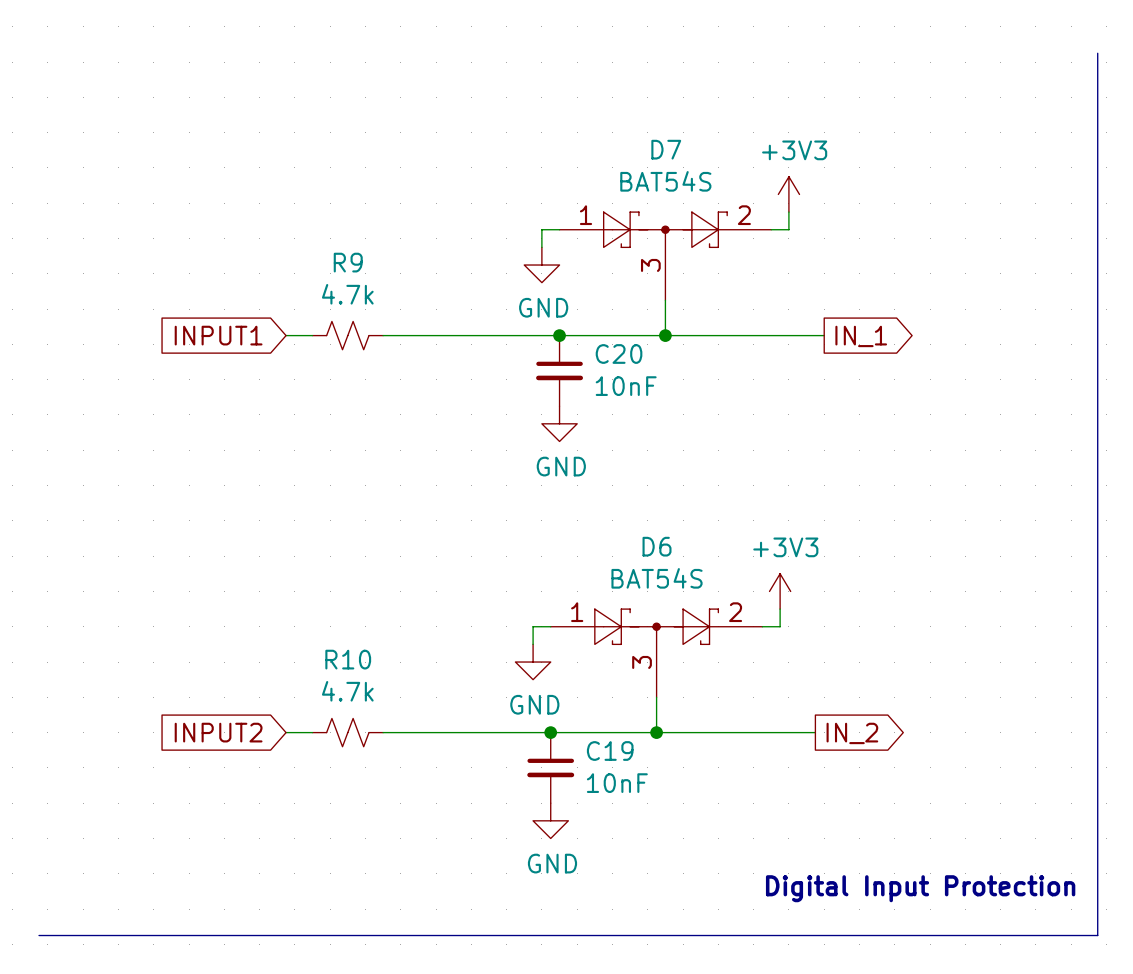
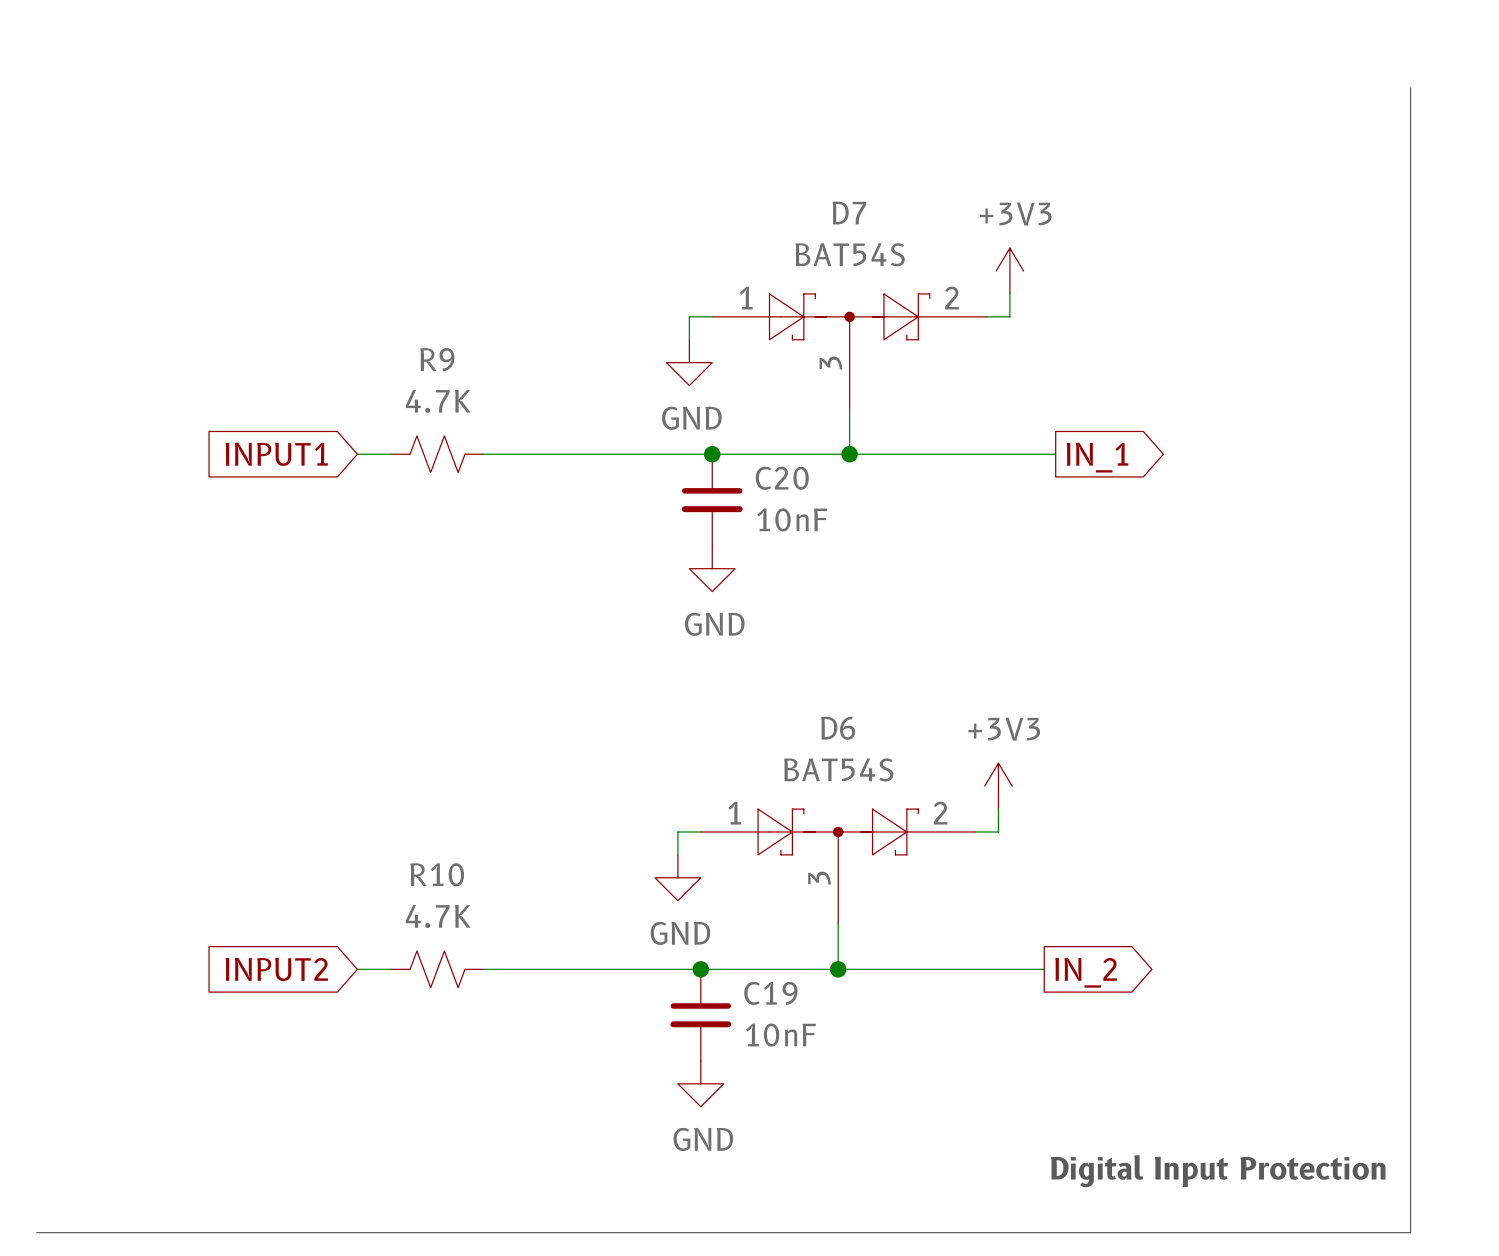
R9 value: 4.7k (347, 294) -> 4.7K (438, 401)
R10 value: 4.7k (347, 691) -> 4.7K (438, 916)

